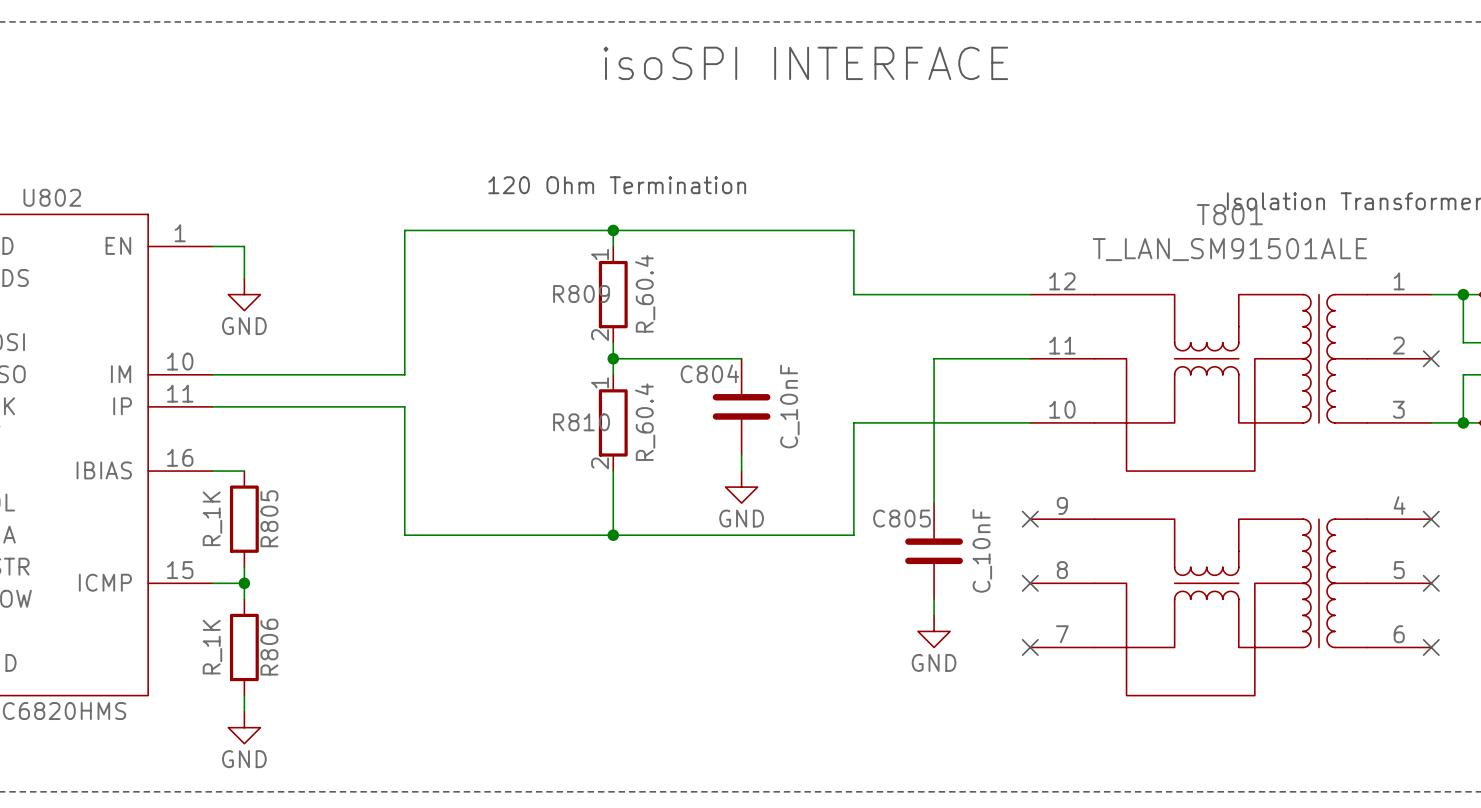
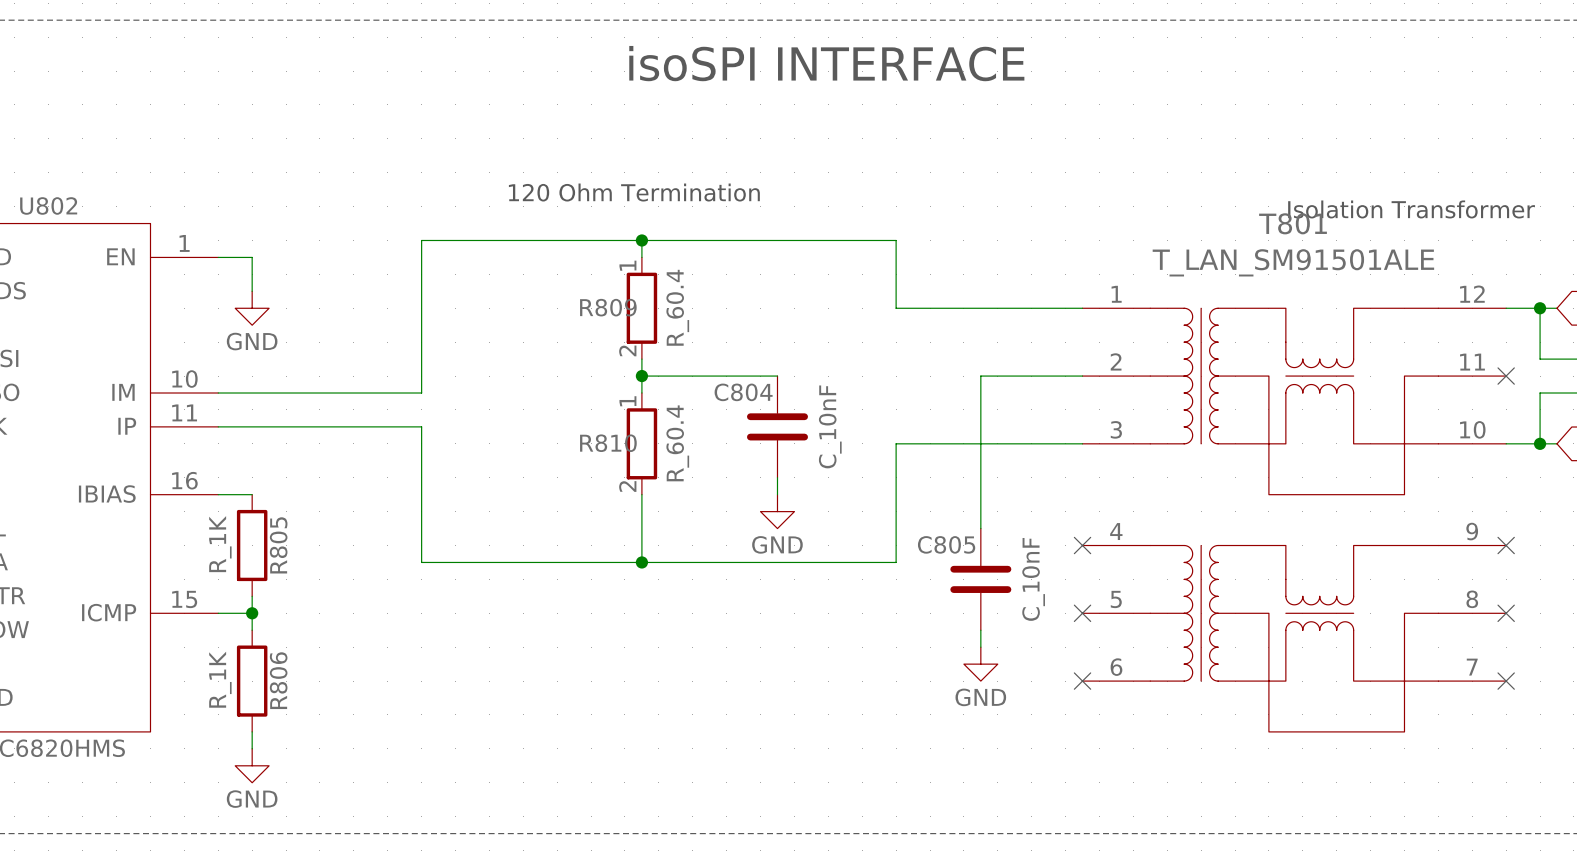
T801 flip: as is (1230, 495) -> left-right (1294, 520)

